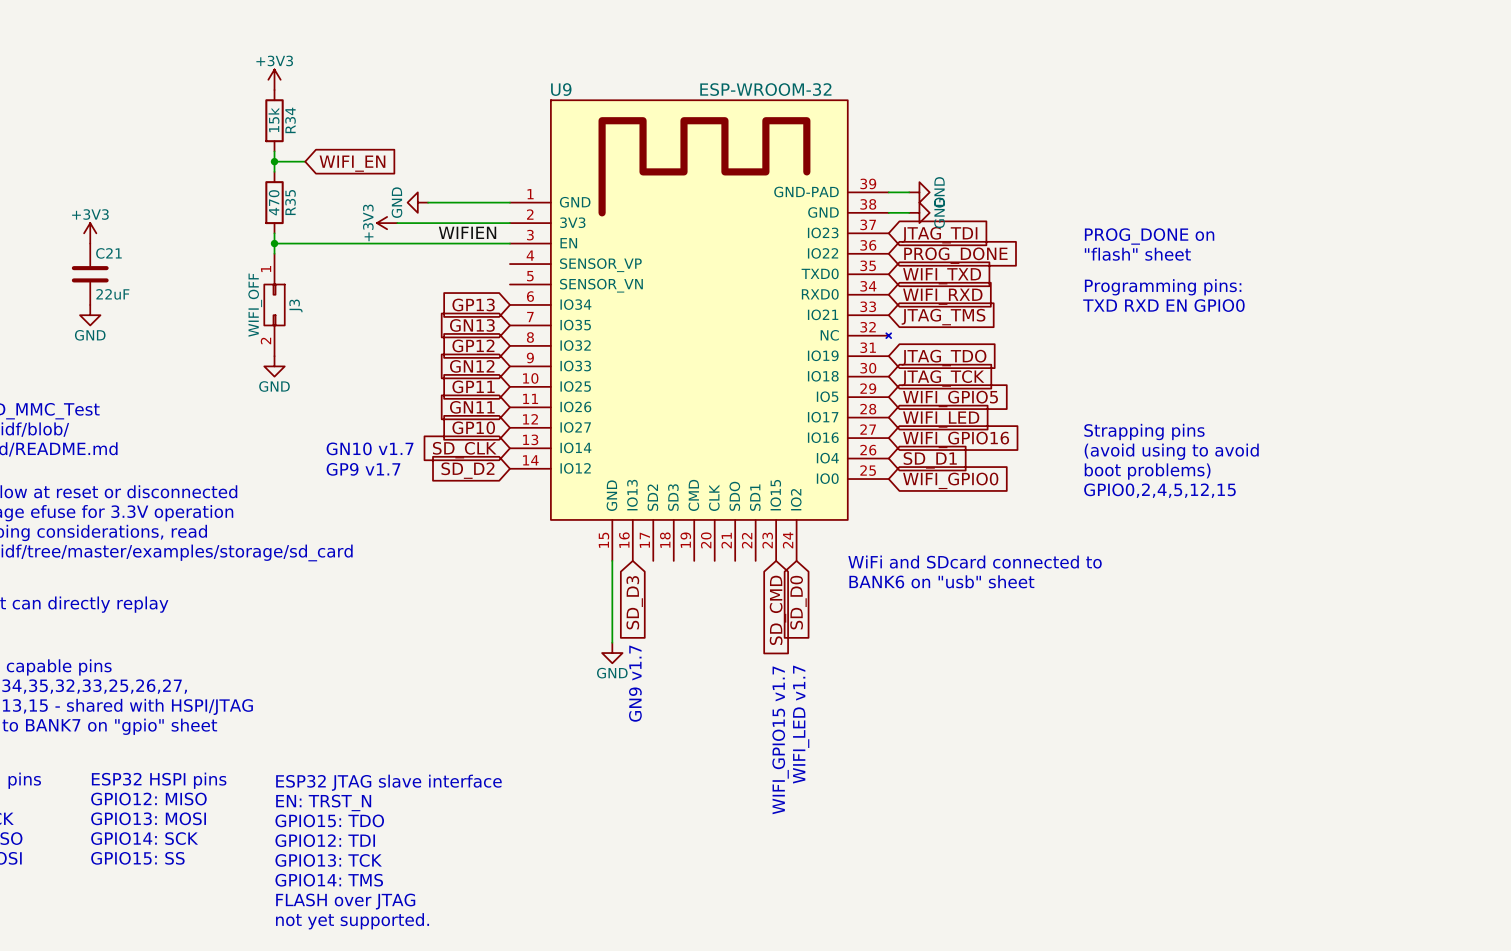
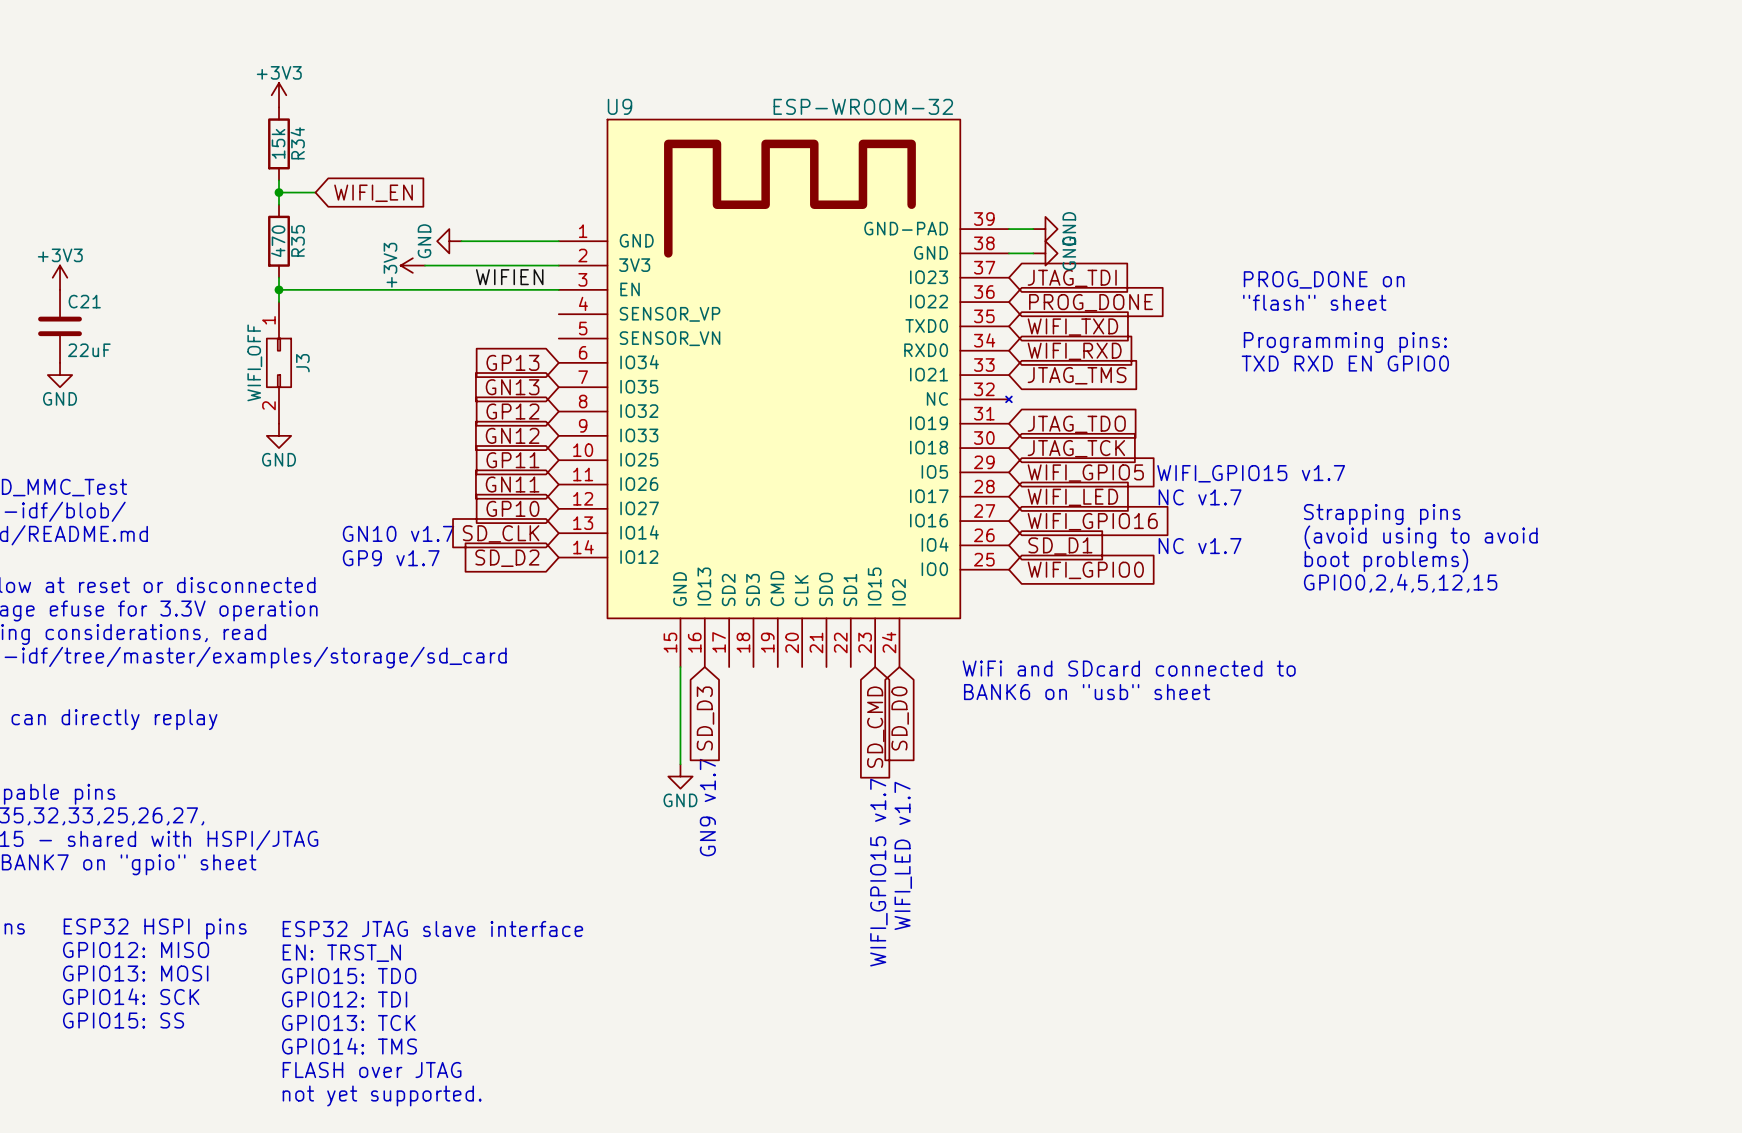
text: none -> WIFI_GPIO15 v1.7 (1251, 473)
text: none -> NC v1.7 (1200, 497)
text position: Strapping pins (1144, 431) -> Strapping pins (1382, 514)
text position: (avoid using to avoid (1171, 451) -> (avoid using to avoid (1421, 537)
text: none -> NC v1.7 (1200, 546)
text position: boot problems) (1147, 471) -> boot problems) (1386, 560)
text position: GPIO0,2,4,5,12,15 (1159, 490) -> GPIO0,2,4,5,12,15 (1400, 583)

